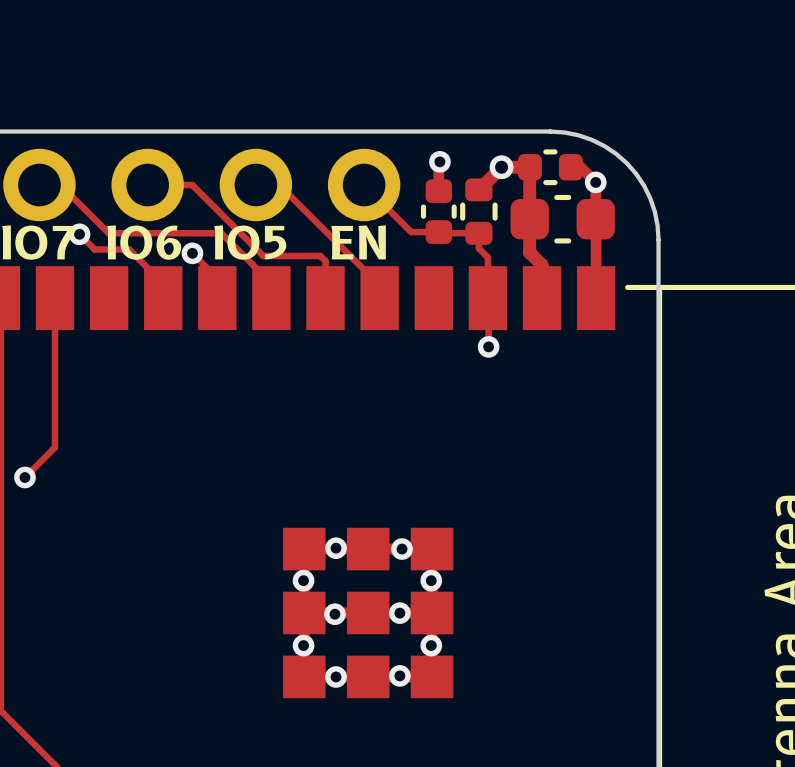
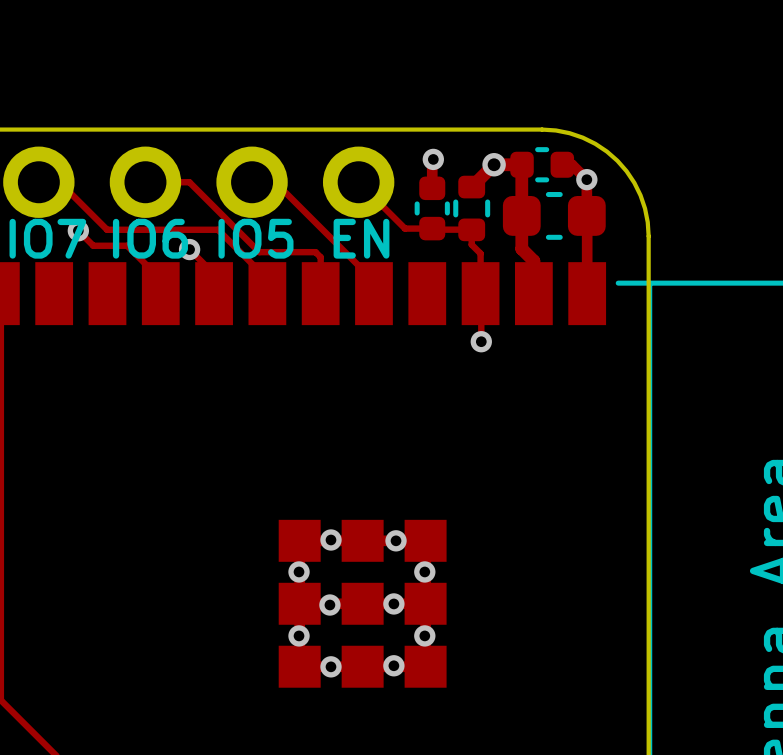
track: (54, 298) (54, 447) (24, 477) -> none
via: (24, 477) -> none

